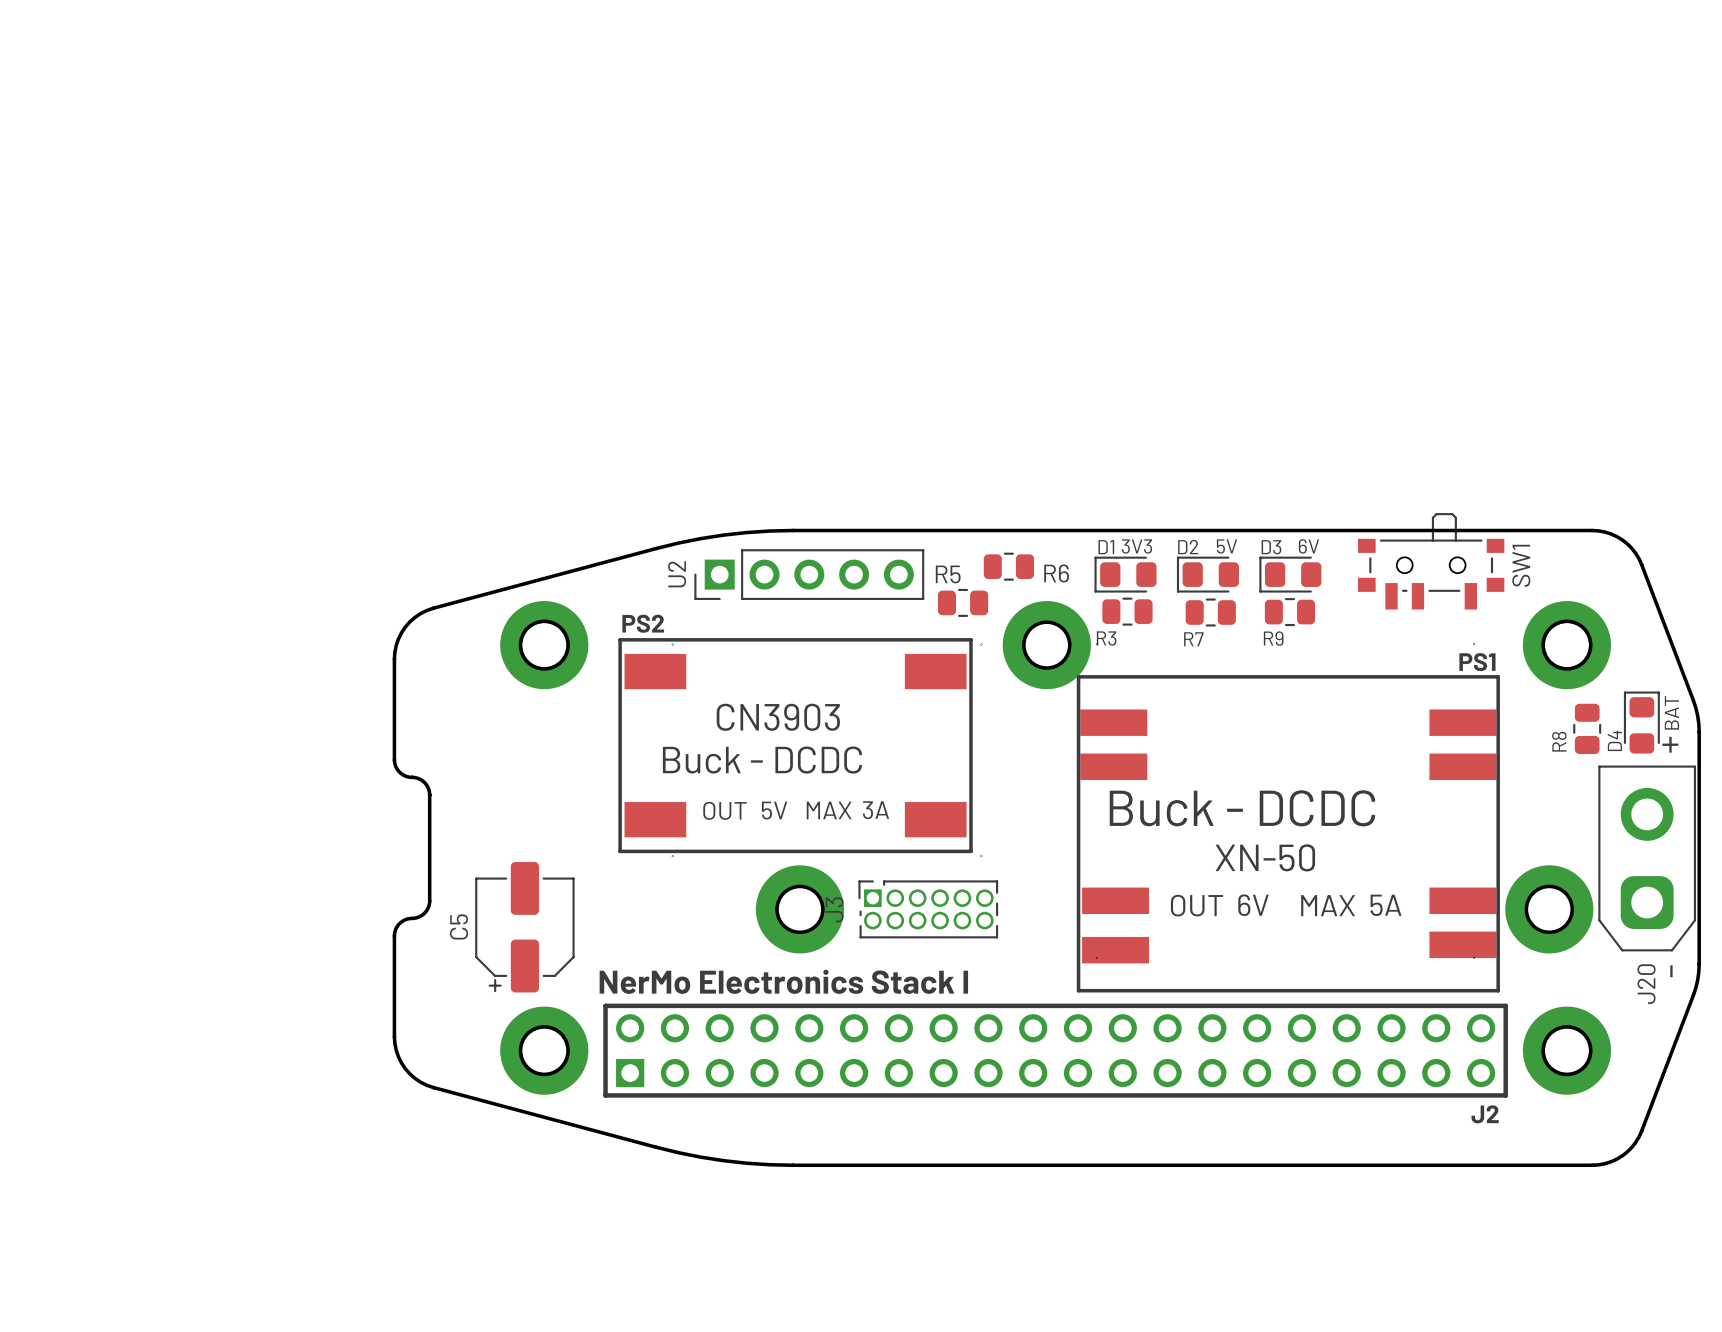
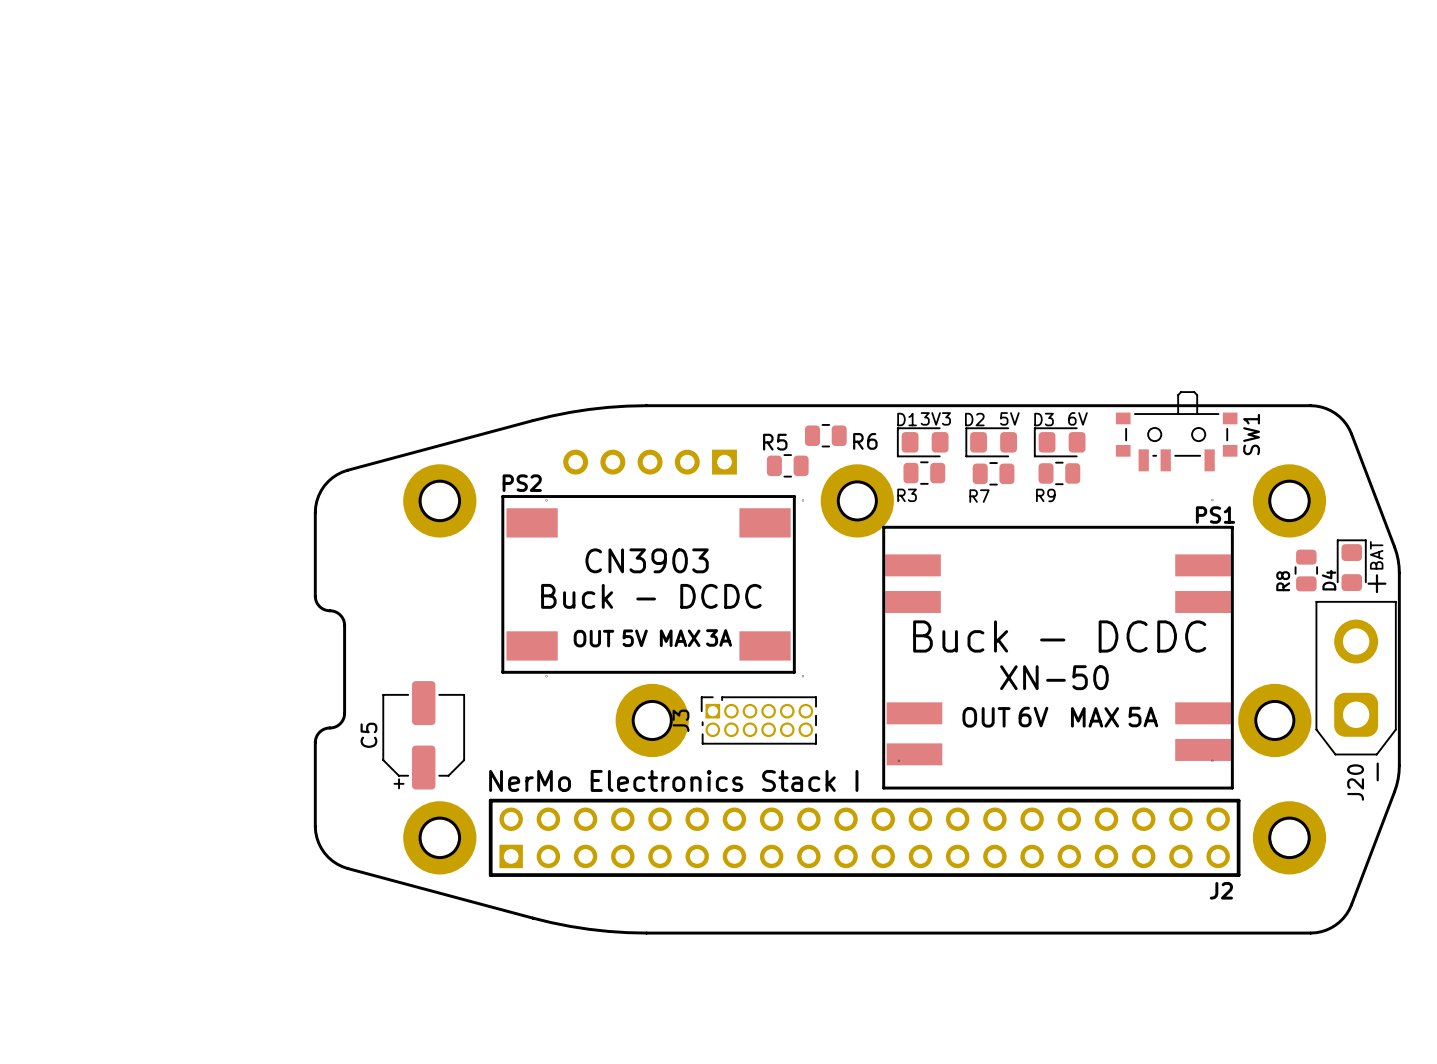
U2 side: top (809, 574) -> bottom (650, 462)

